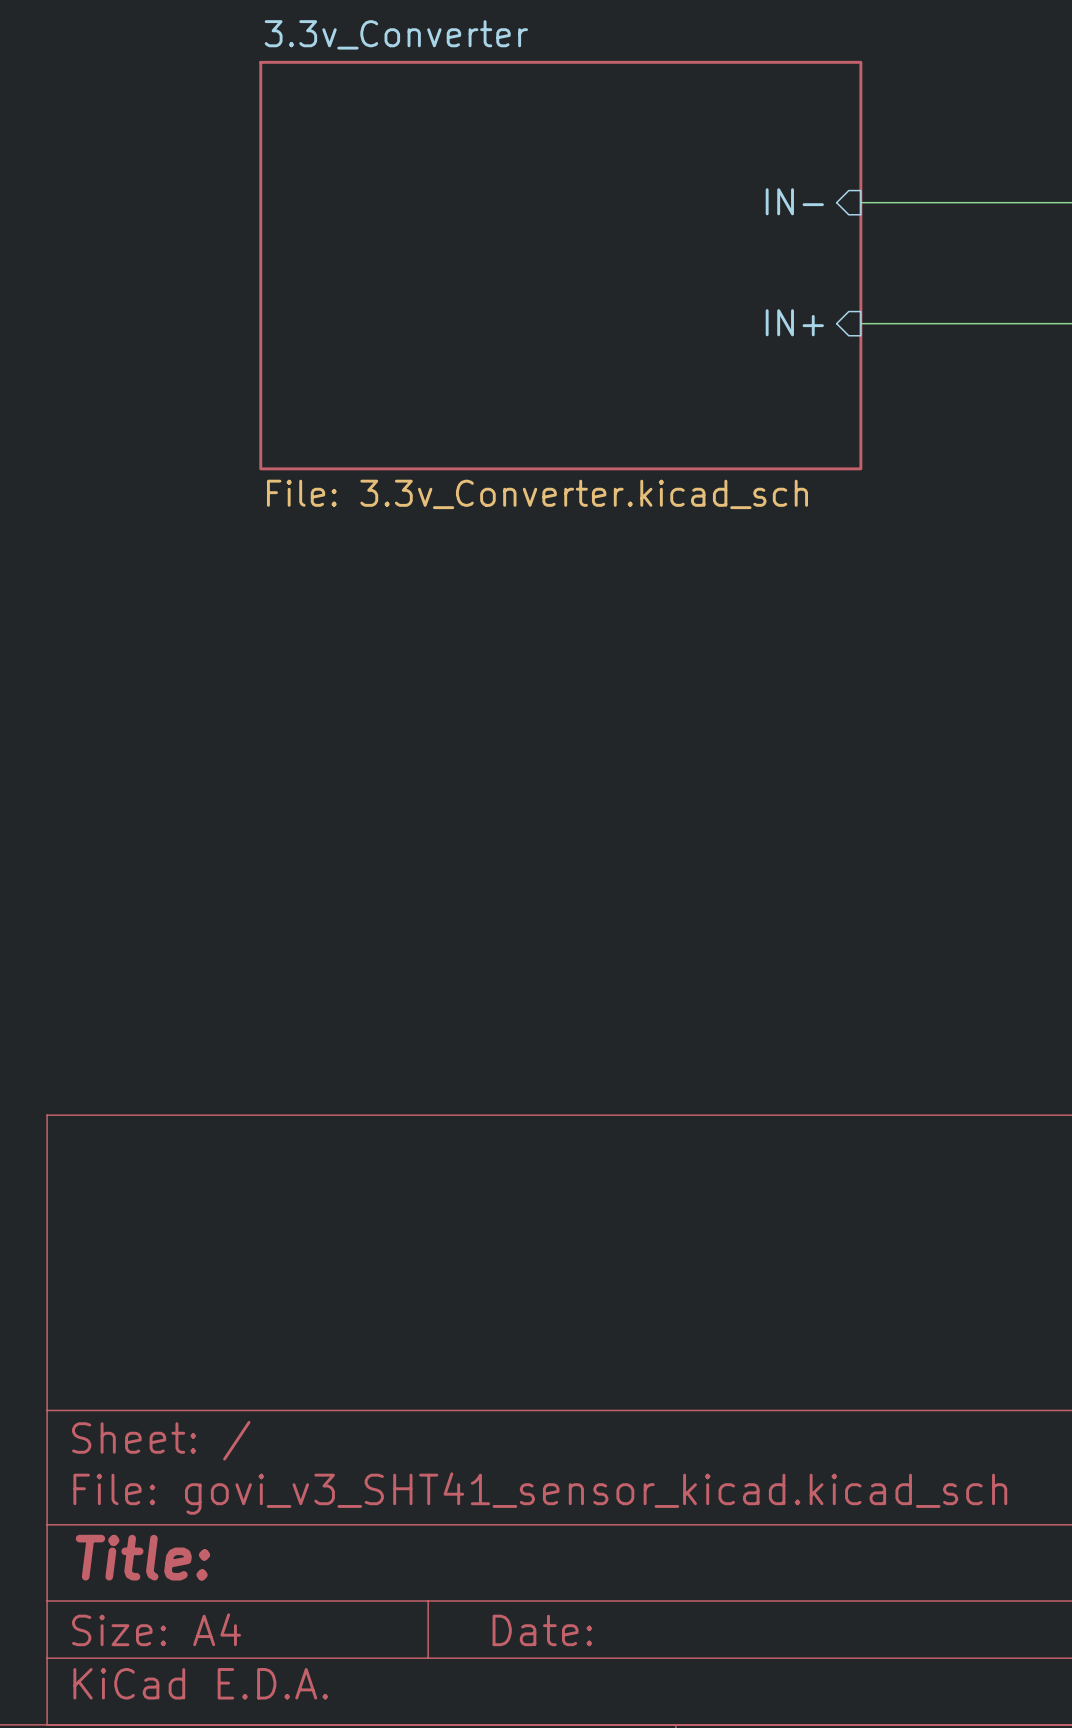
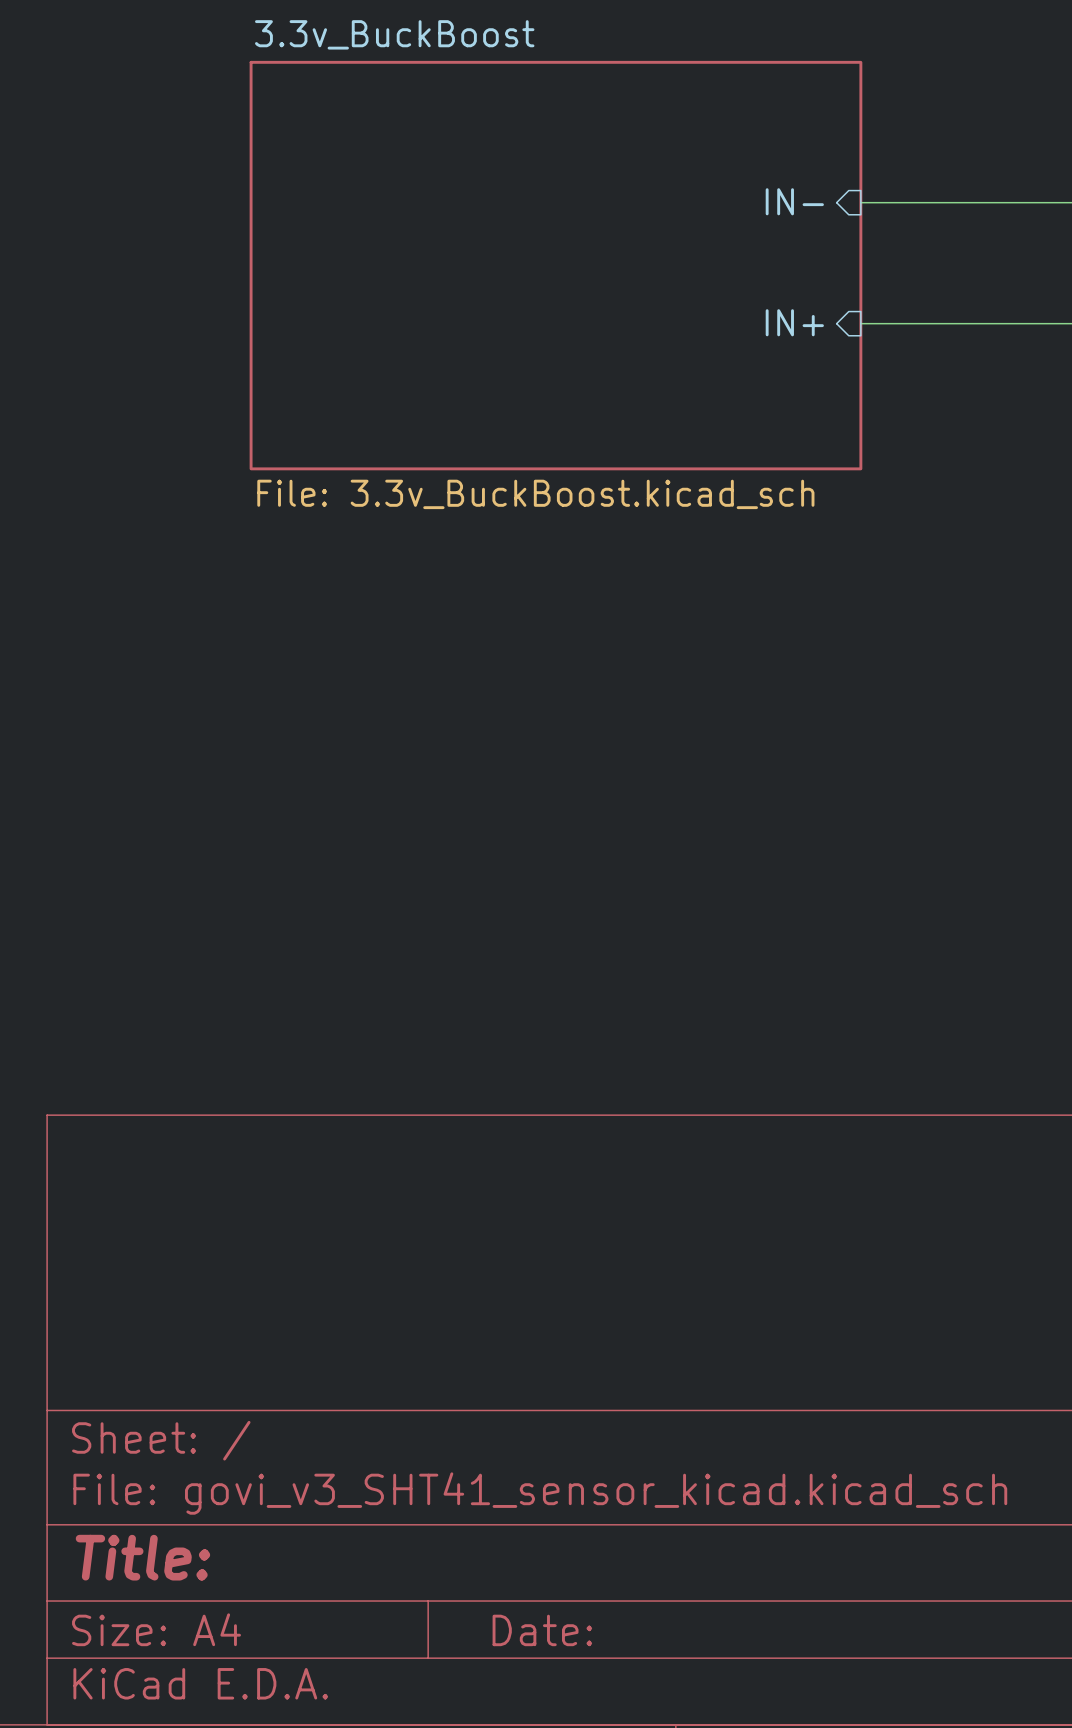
sheet 3.3v_BuckBoost: none -> File: 3.3v_BuckBoost.kicad_sch (555, 265)
sheet 3.3v_Converter: File: 3.3v_Converter.kicad_sch (560, 265) -> none

